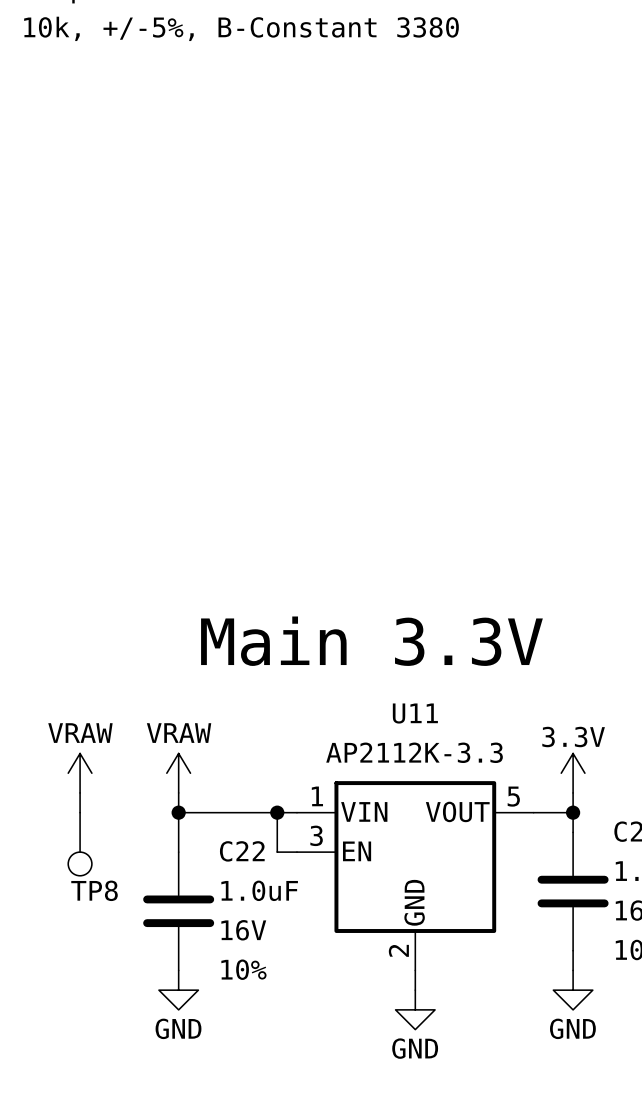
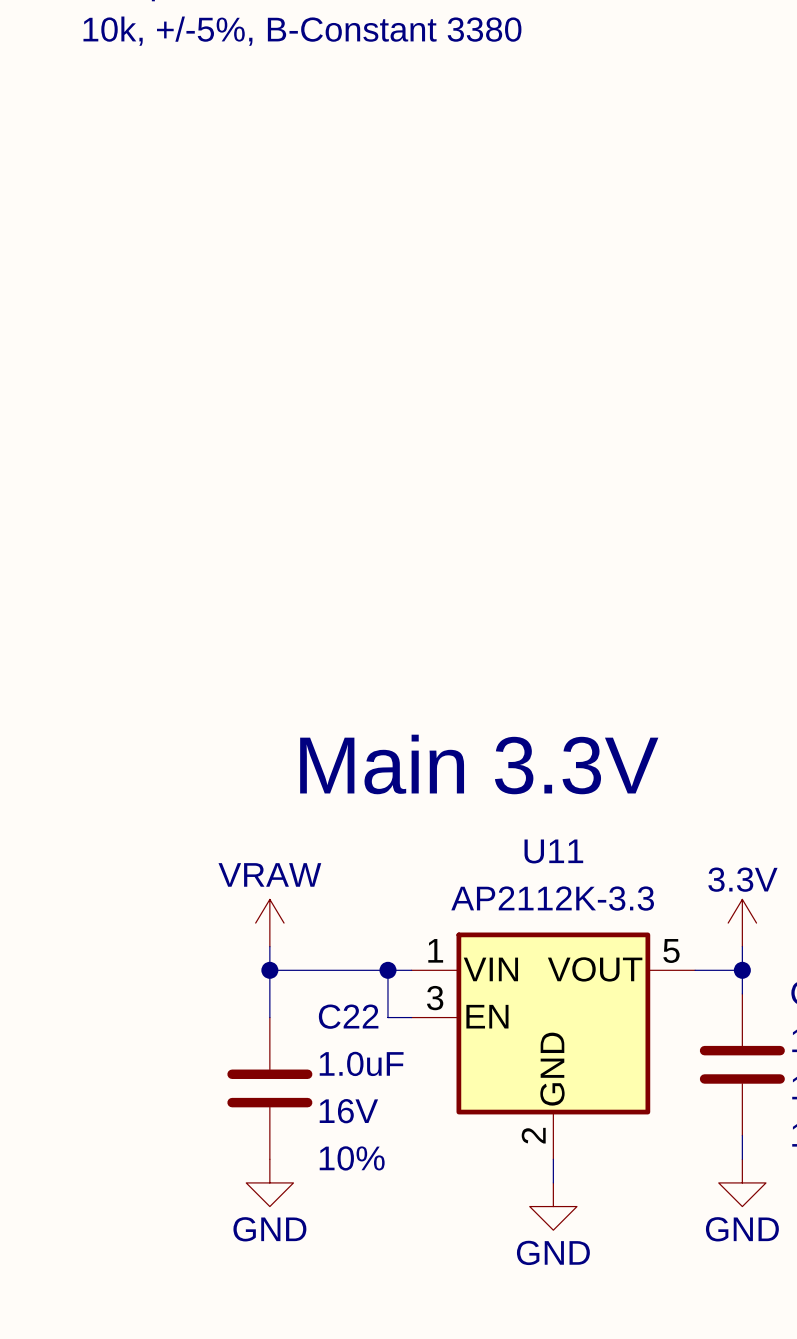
power symbol: VRAW (80, 773) -> none
wire: (80, 792) (80, 812) -> none
TP8: (80, 844) -> none

